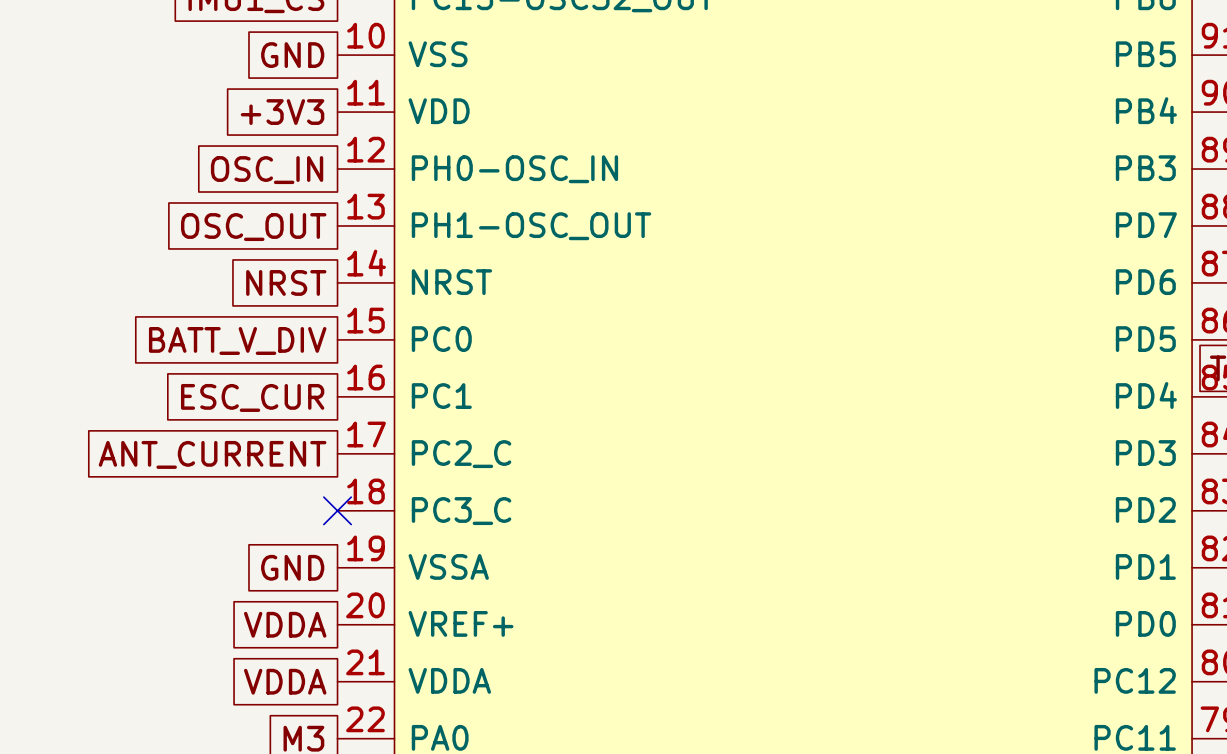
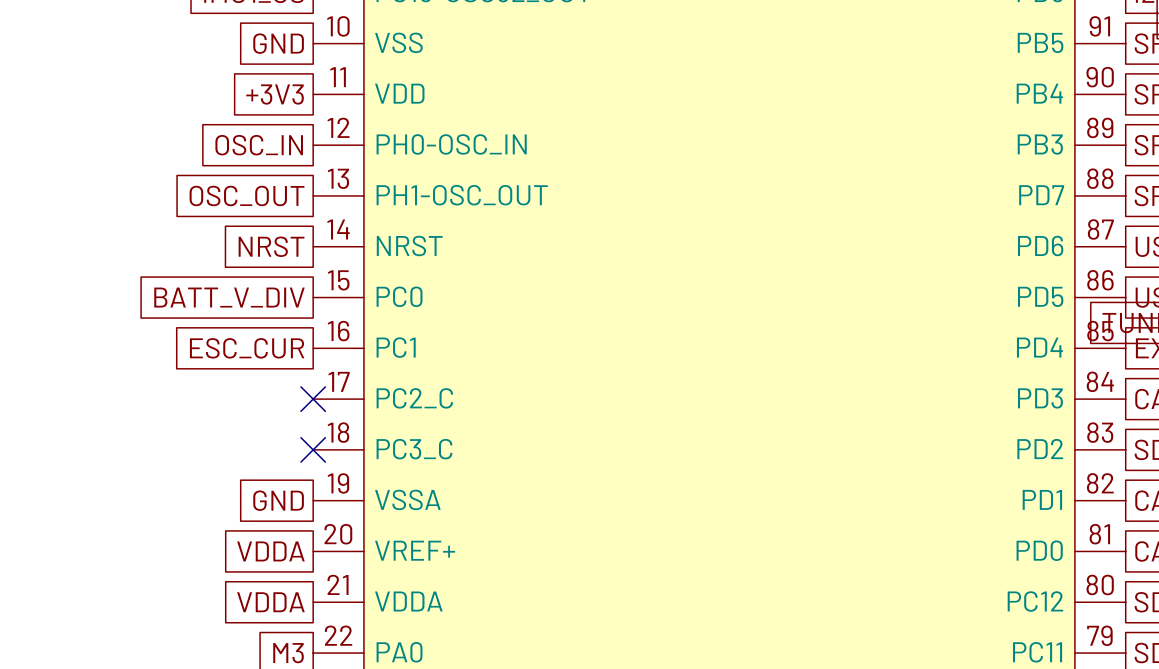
no-connect mark: none -> (313, 399)
global label: ANT_CURRENT (212, 454) -> none

